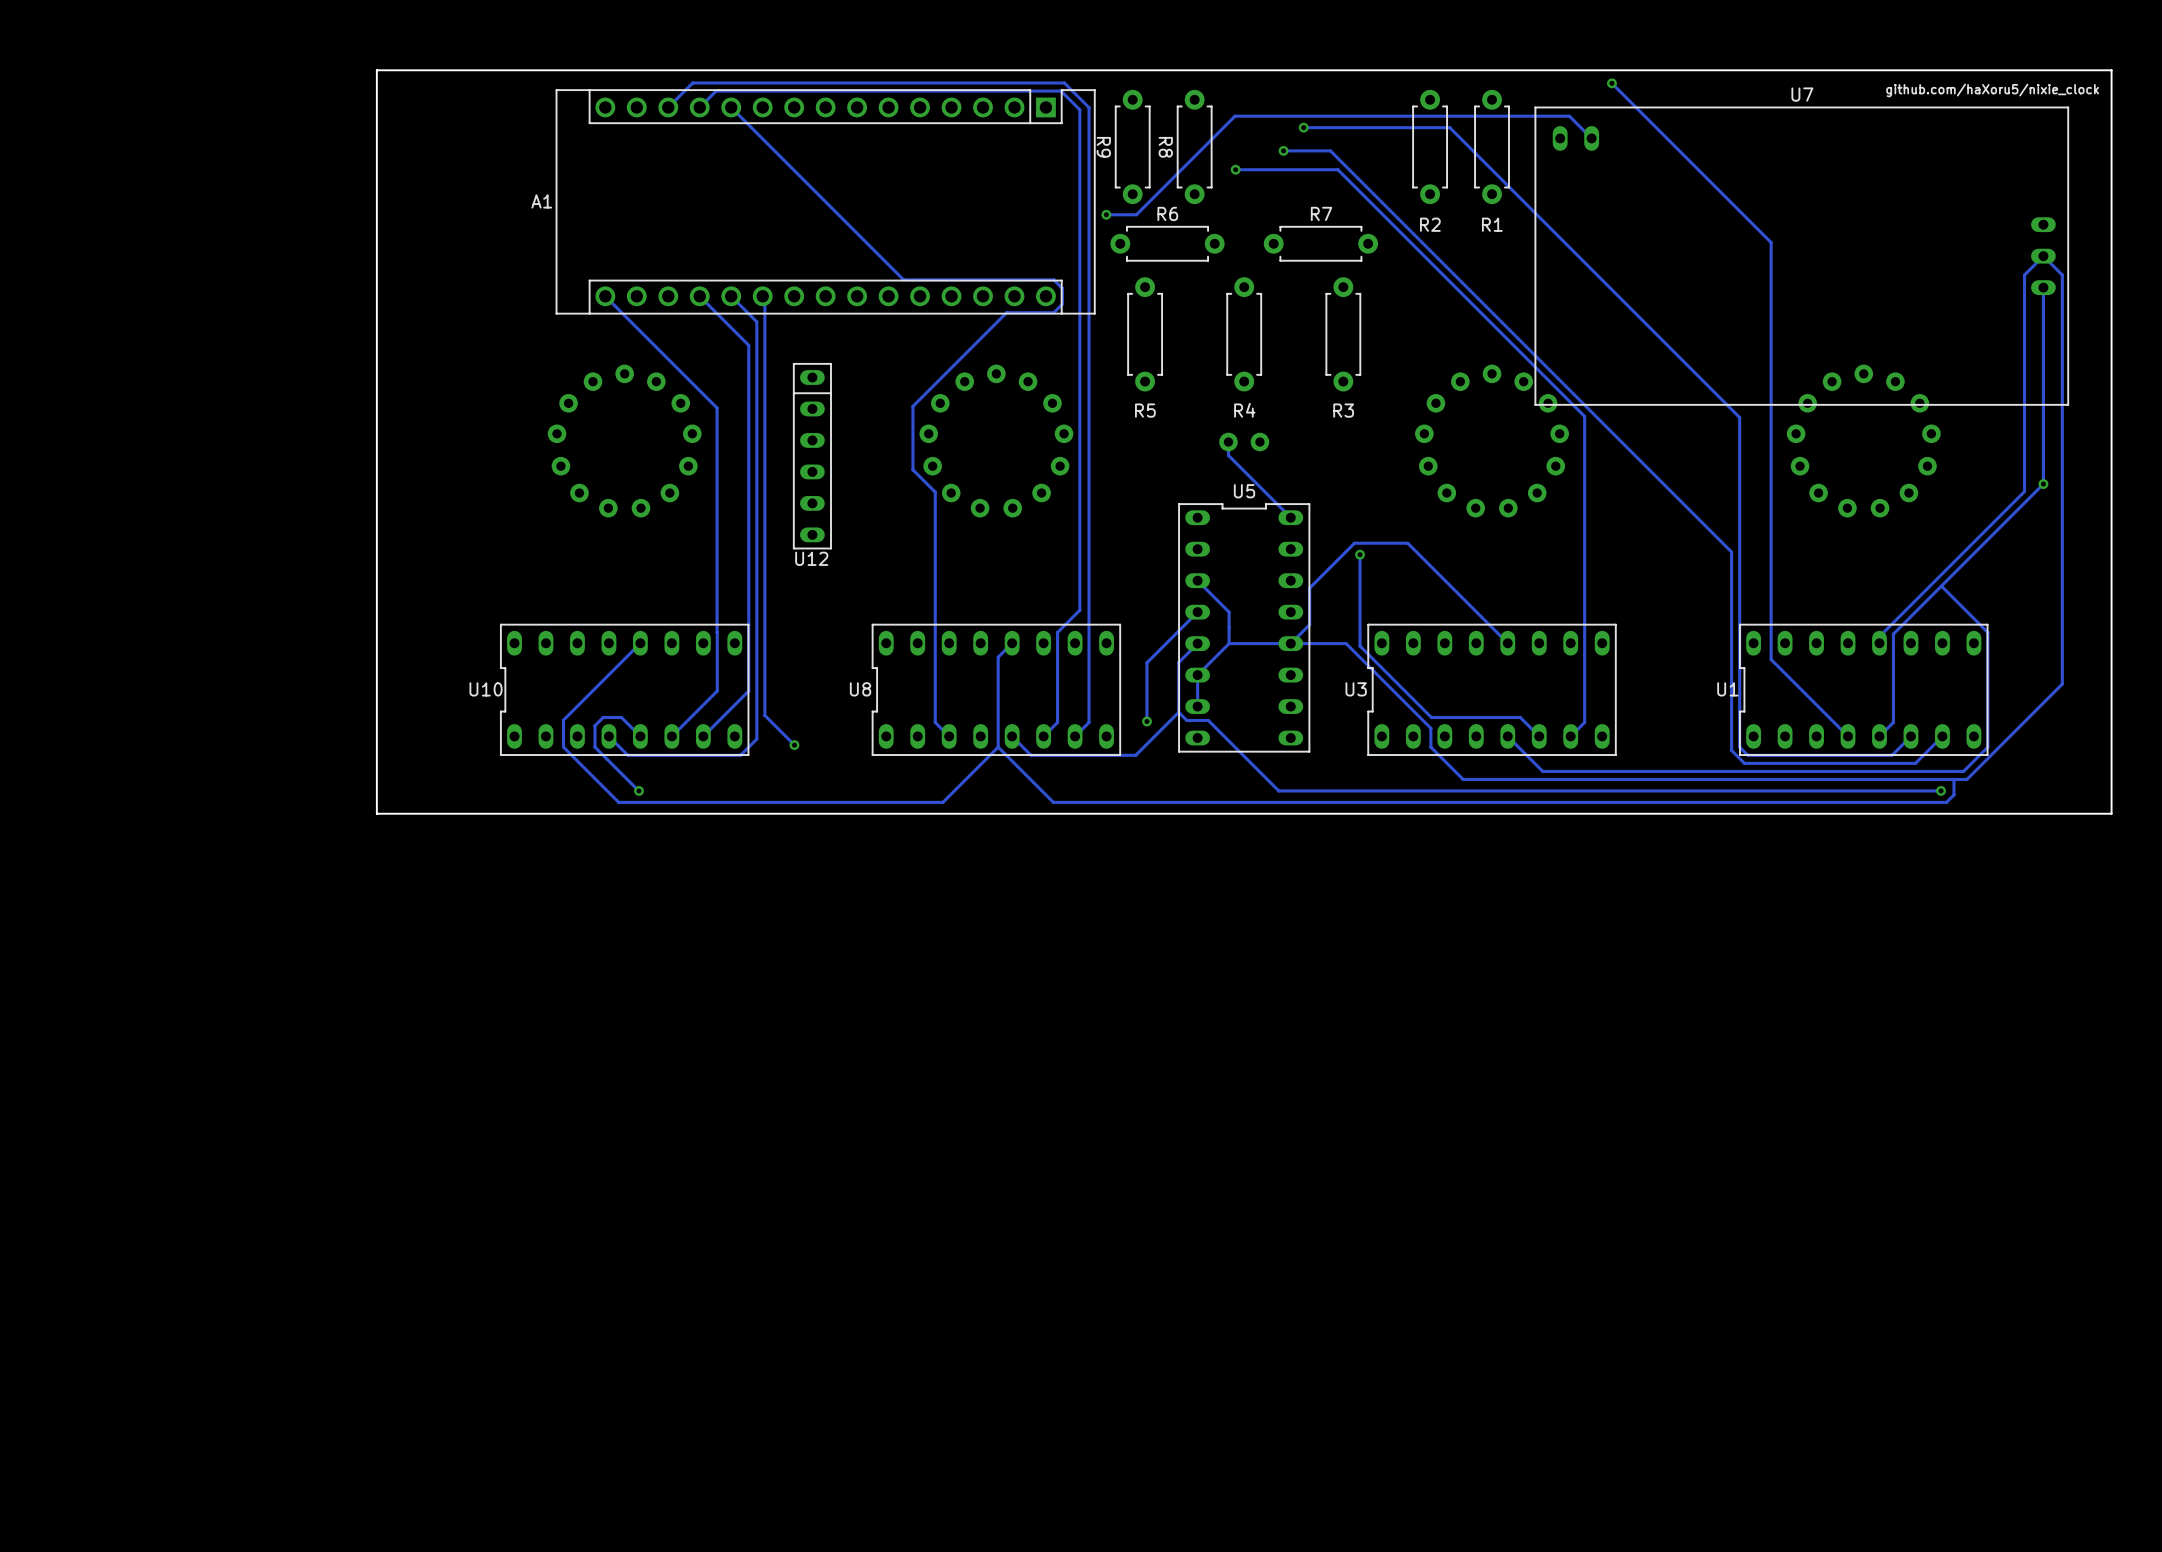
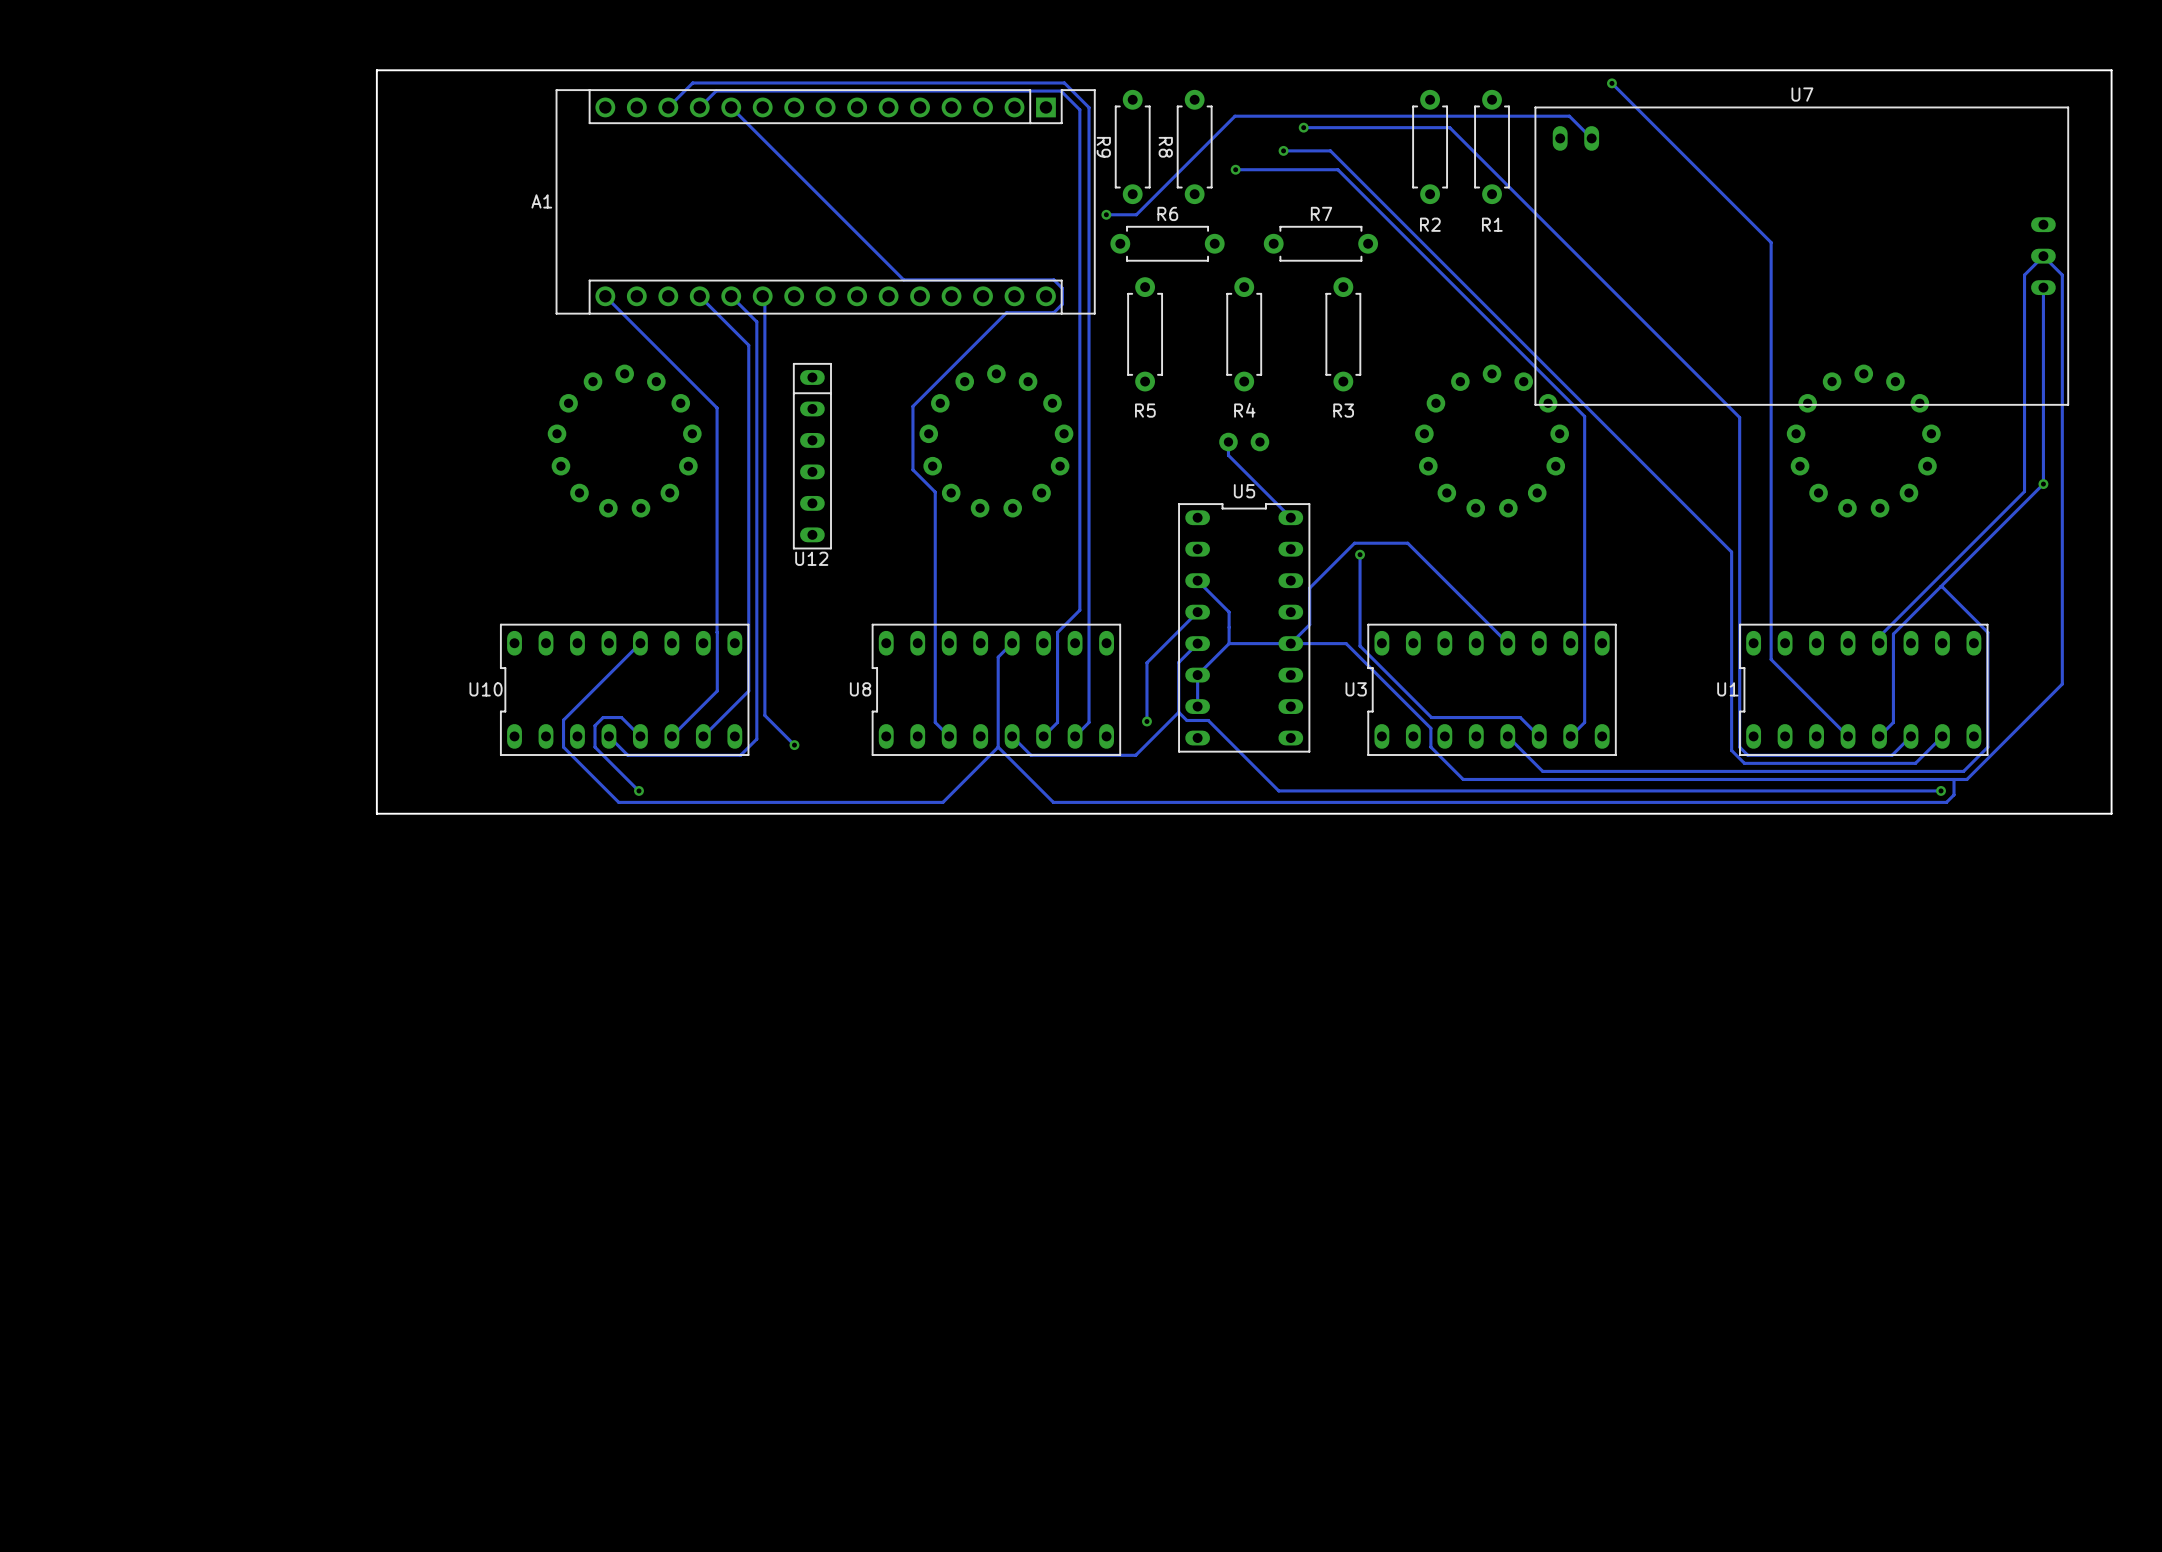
text: github.com/haXoru5/nixie_clock (1992, 90) -> none

